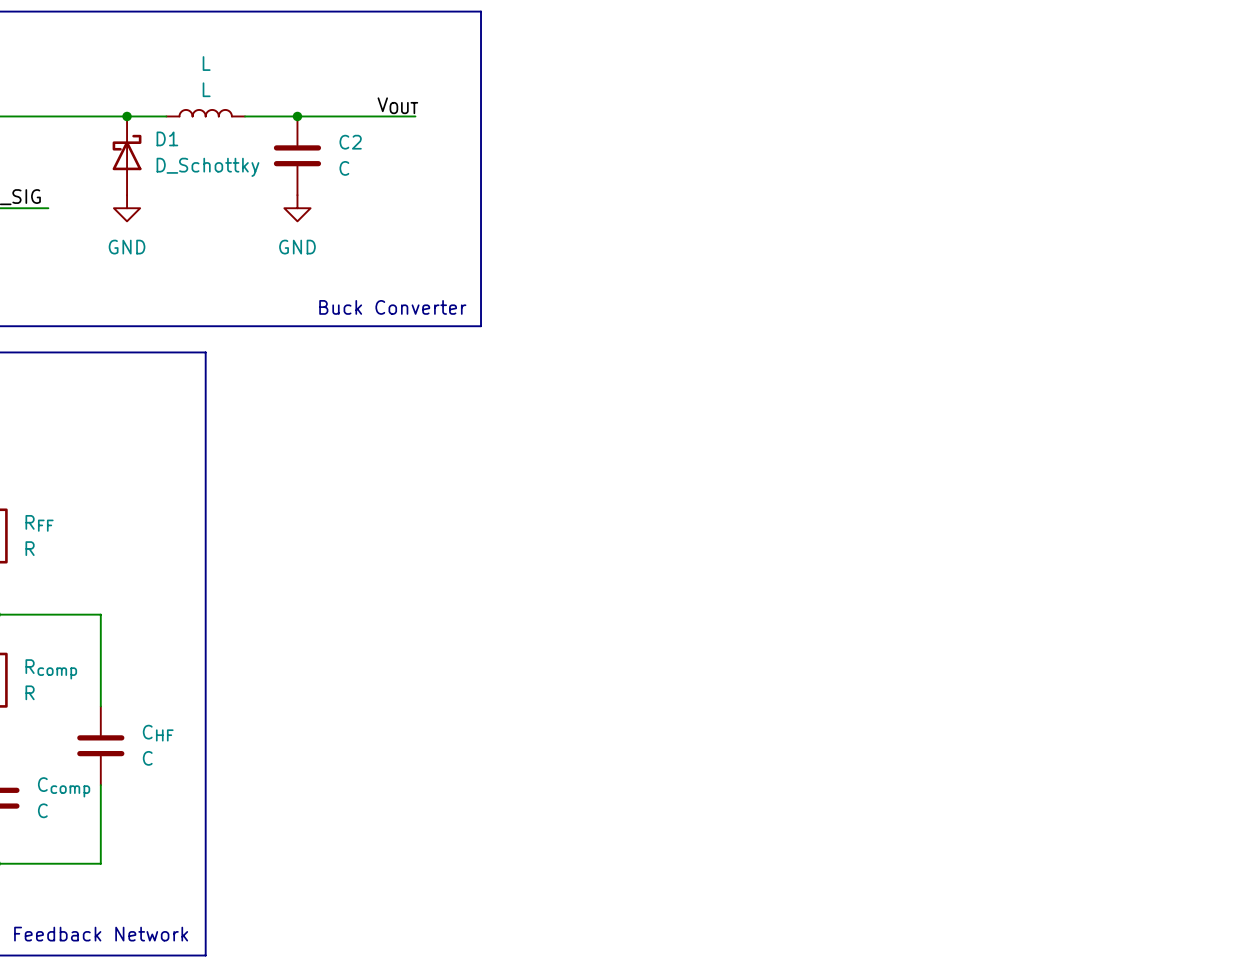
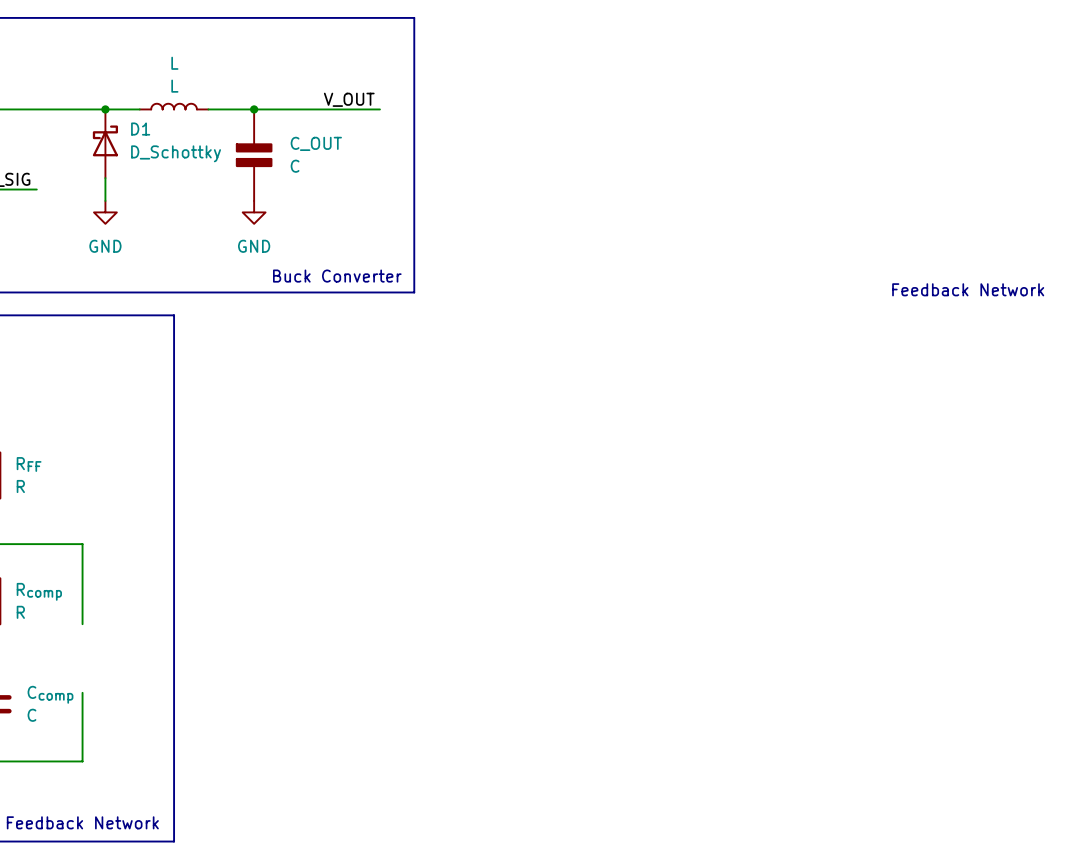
label: VOUT (397, 105) -> V_OUT (349, 99)
wire: none -> (357, 109) (379, 109)
C2: C (297, 155) -> none
C_OUT: none -> C (254, 155)
power symbol position: GND (127, 208) -> GND (105, 212)
power symbol position: GND (297, 208) -> GND (254, 212)
text: none -> Feedback Network (968, 289)
CHF: C (100, 745) -> none

